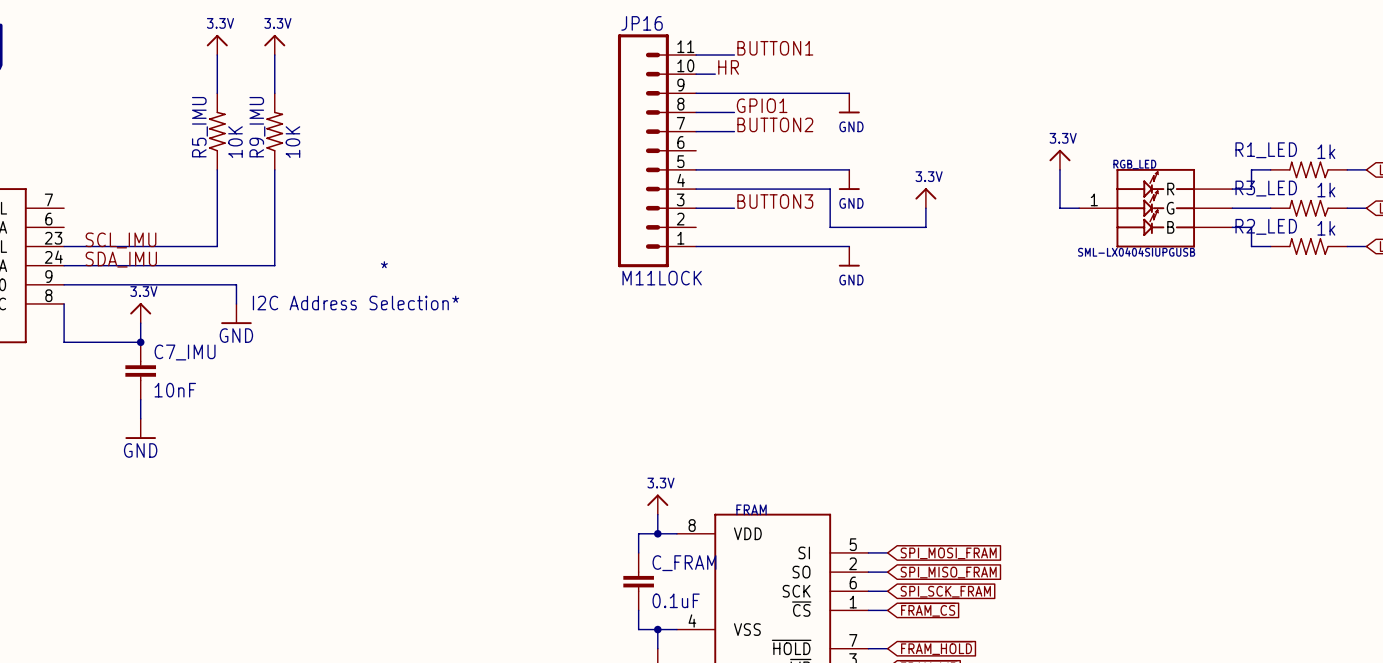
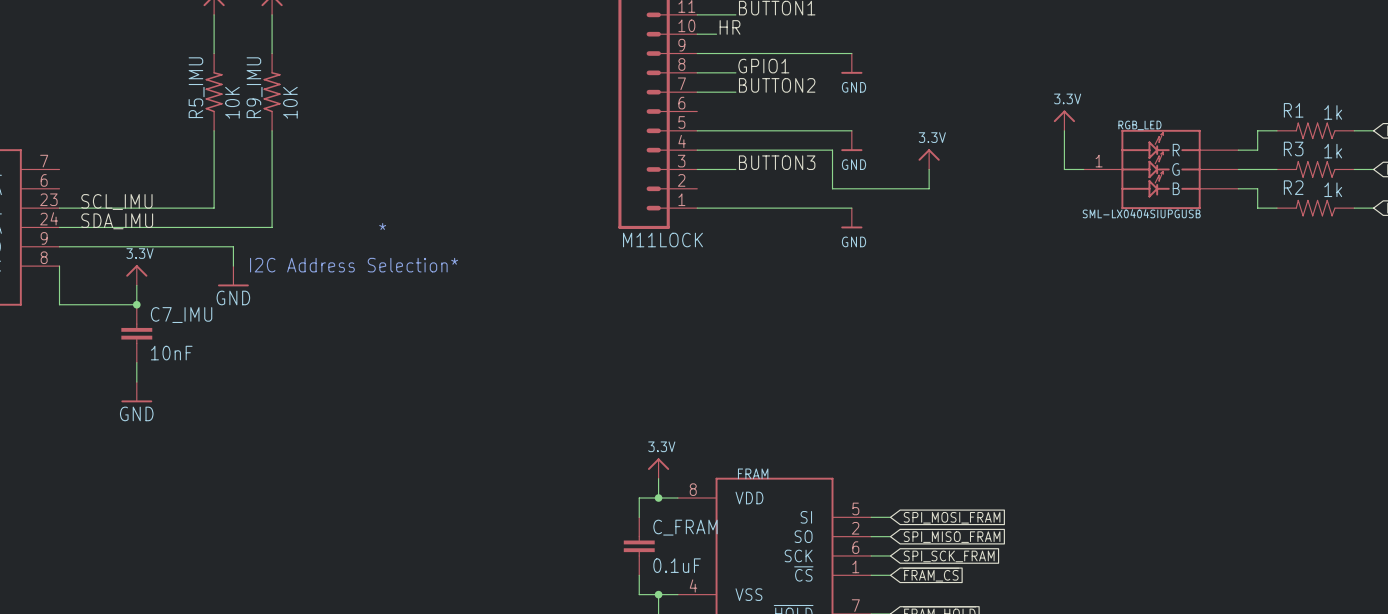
R1_LED name: R1_LED (1266, 150) -> R1 (1293, 110)
R3_LED name: R3_LED (1266, 188) -> R3 (1293, 148)
R2_LED name: R2_LED (1266, 226) -> R2 (1293, 187)

